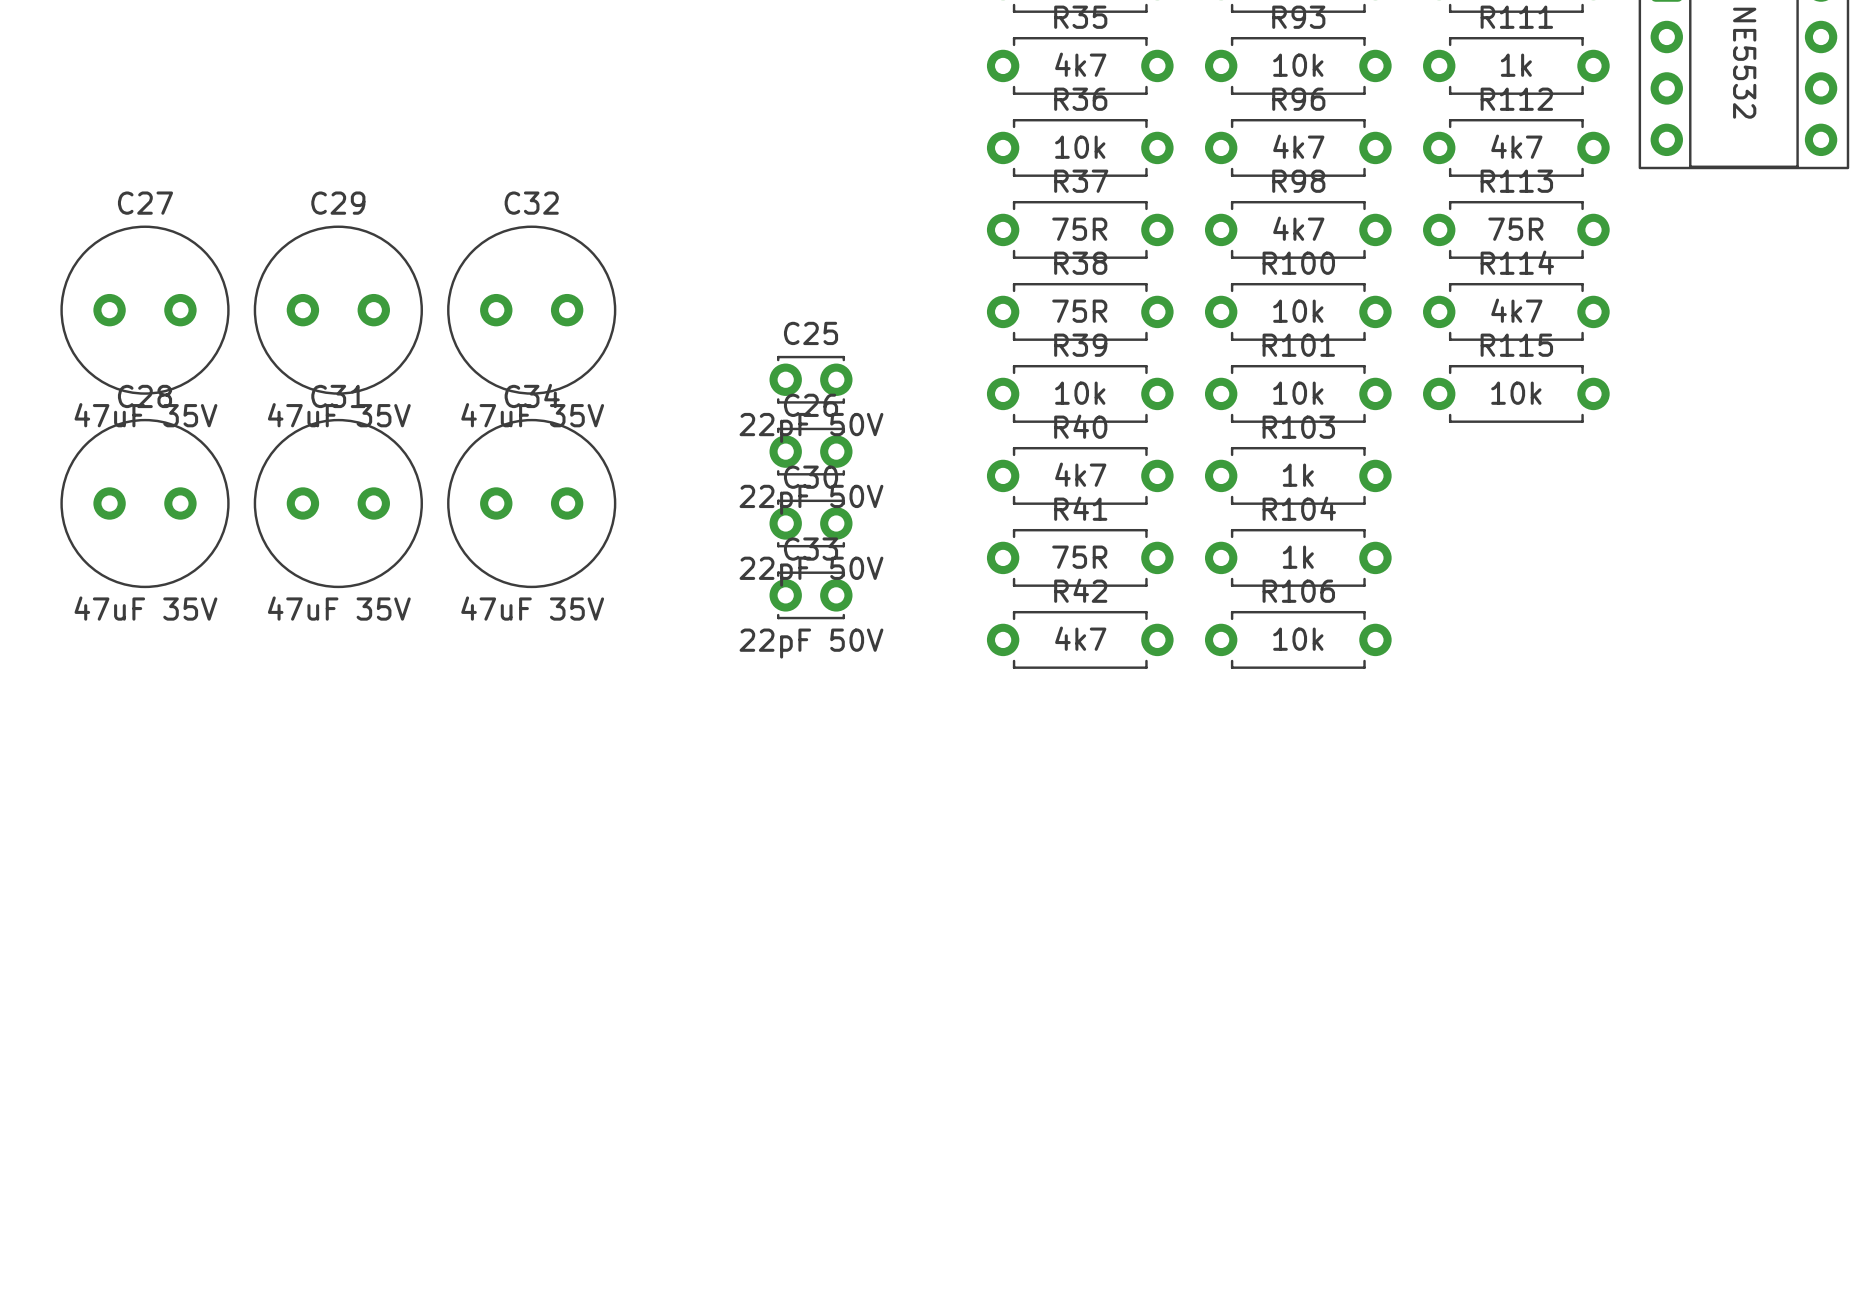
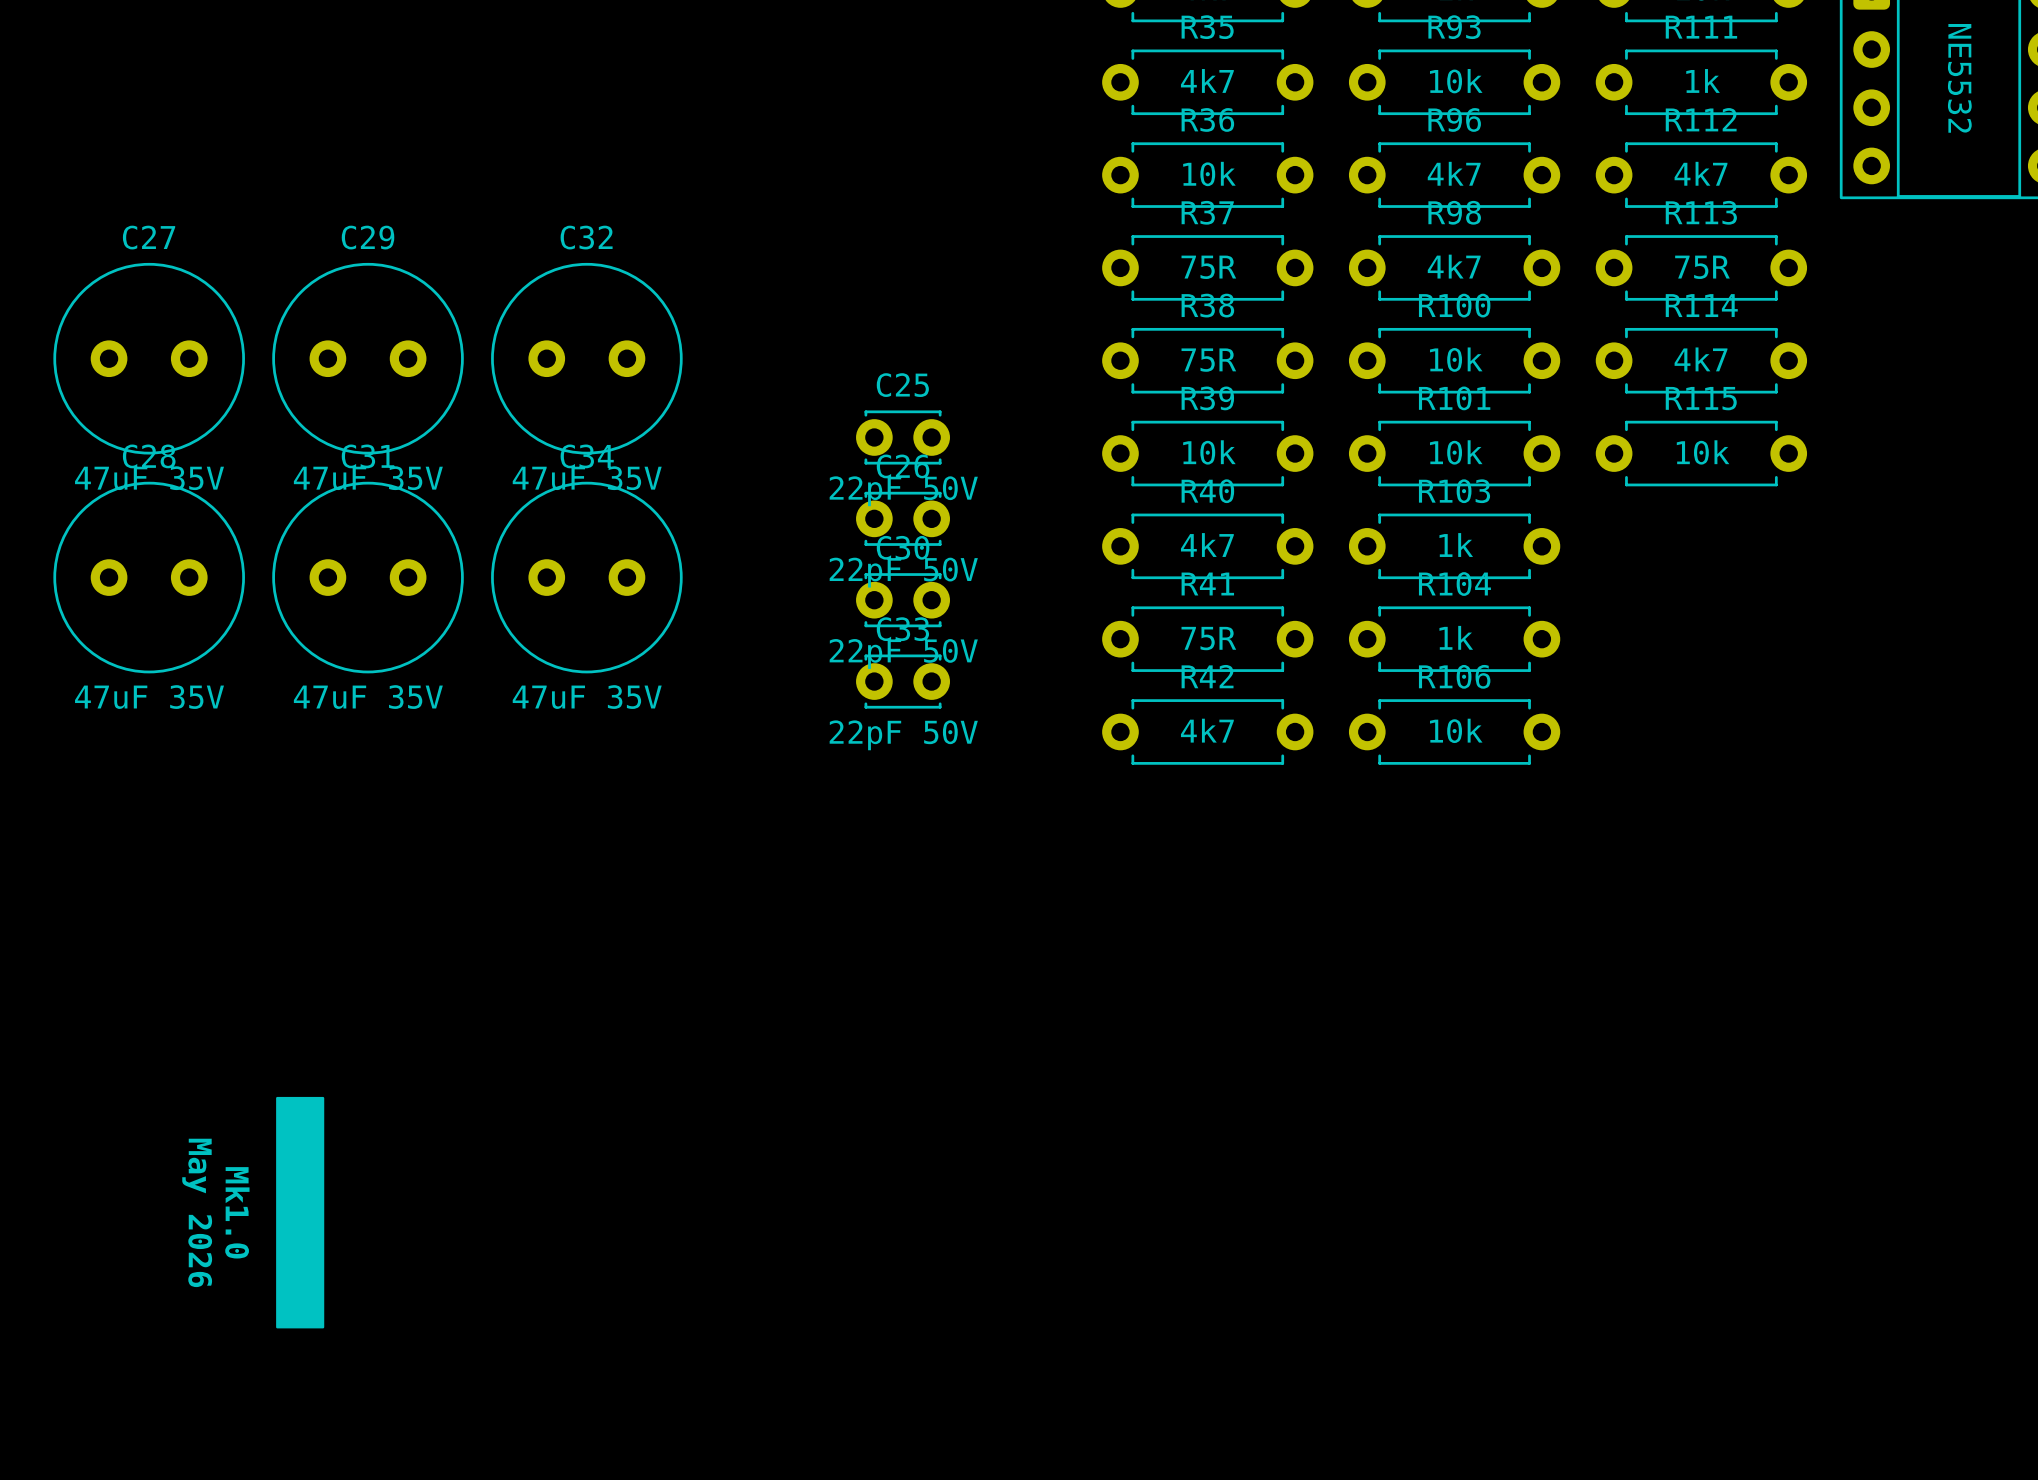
drawing: none -> [276, 1096, 325, 1329]
text: none -> May 2026 (197, 1212)
text: none -> Mk1.0 (237, 1212)

